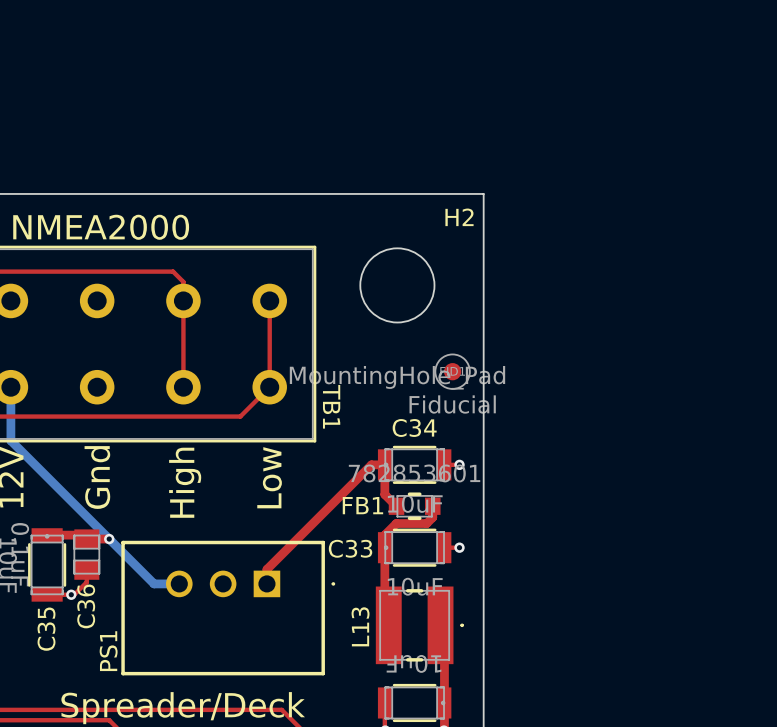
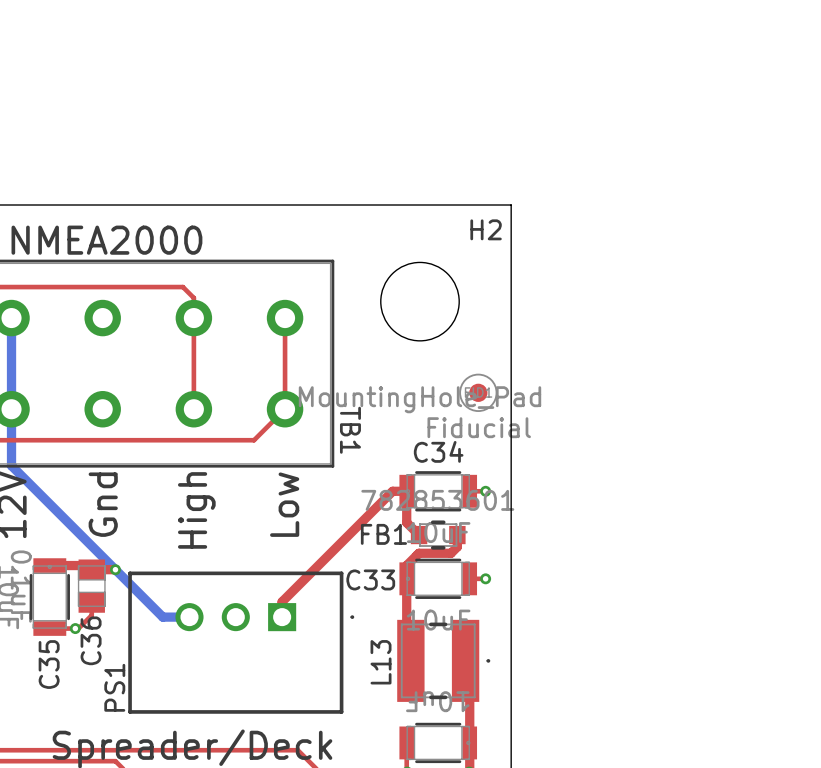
bottom track: none -> (11, 318) (11, 409)

